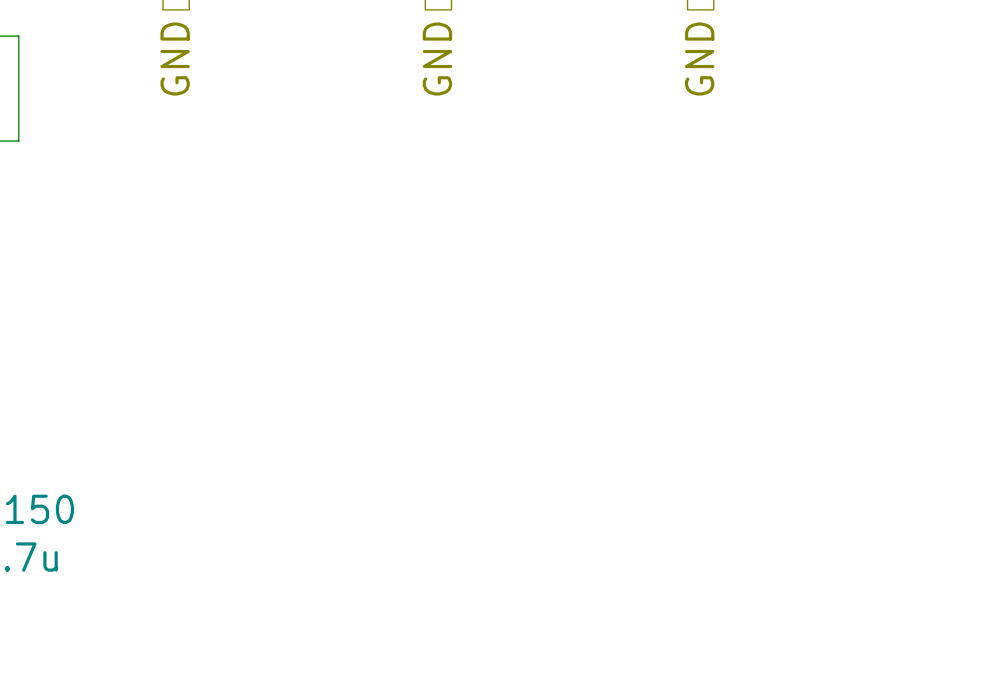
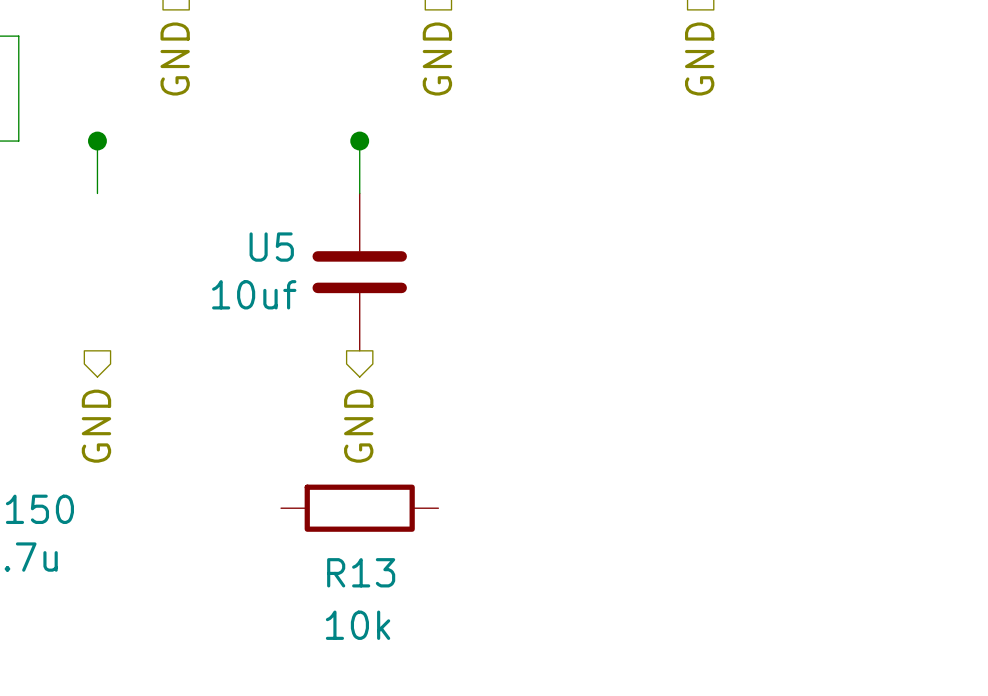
wire: none -> (97, 141) (97, 193)
junction: none -> (97, 141)
wire: none -> (359, 141) (359, 193)
junction: none -> (359, 141)
U5: none -> 10uf (359, 272)
hierarchical label: none -> GND (96, 426)
hierarchical label: none -> GND (358, 426)
R13: none -> 10k (359, 508)

